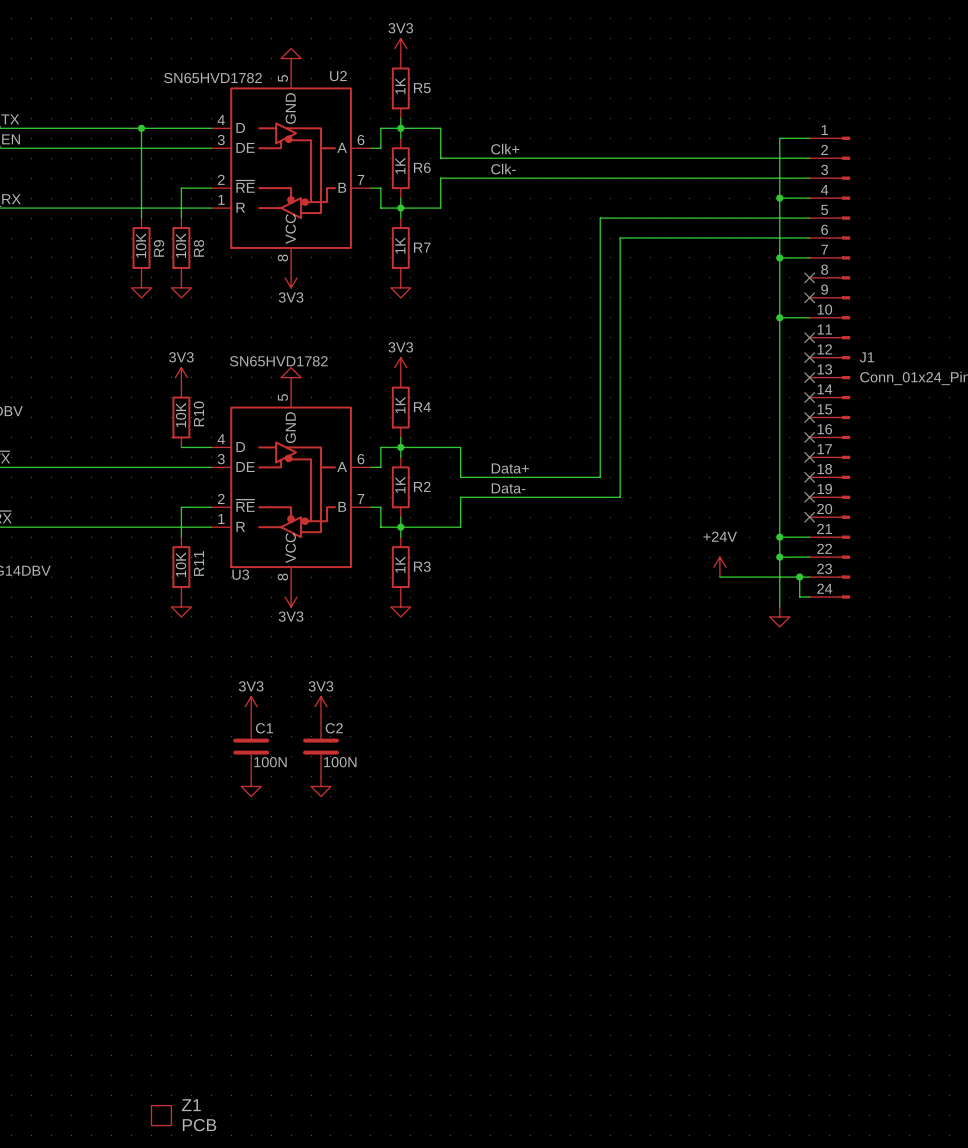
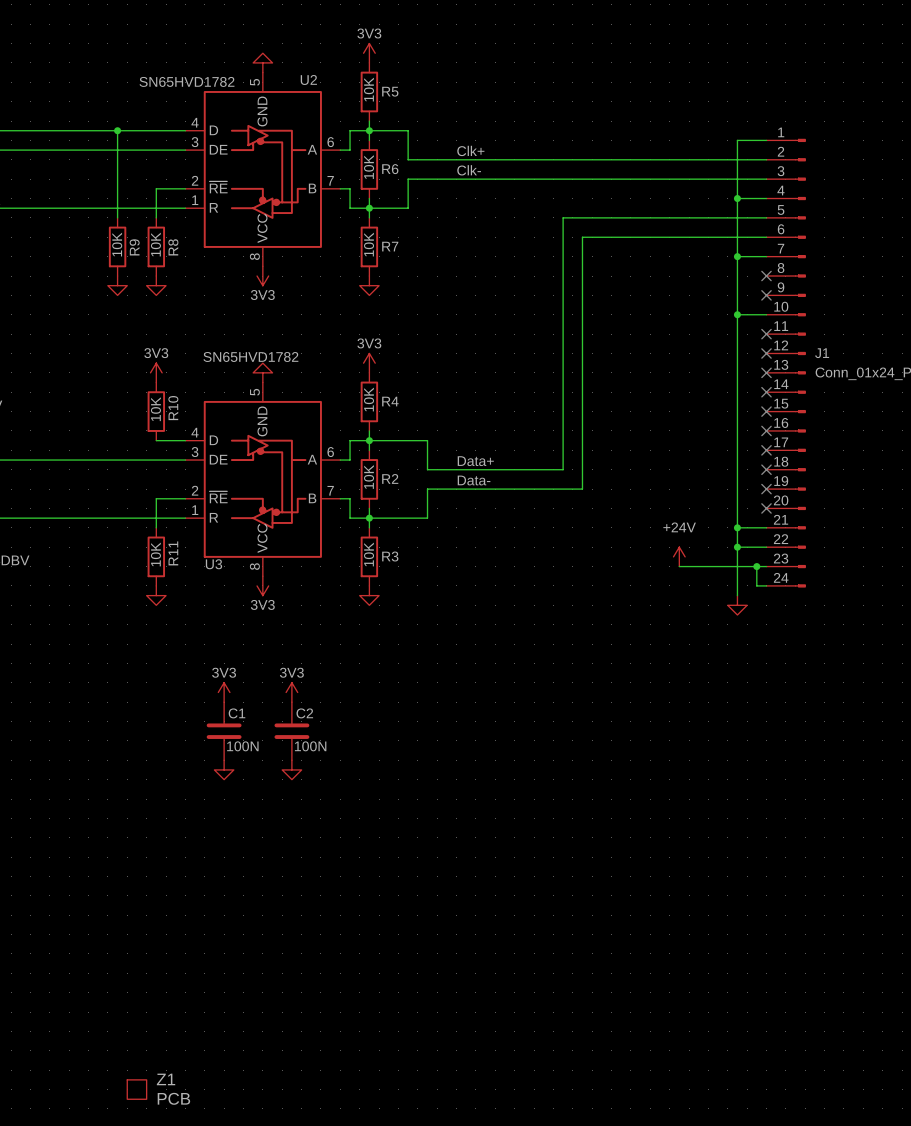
R5 value: 1K (400, 85) -> 10K (369, 89)
R6 value: 1K (400, 165) -> 10K (369, 167)
R7 value: 1K (400, 245) -> 10K (369, 244)
R4 value: 1K (400, 405) -> 10K (369, 399)
R2 value: 1K (400, 484) -> 10K (369, 477)
R3 value: 1K (400, 564) -> 10K (369, 554)

